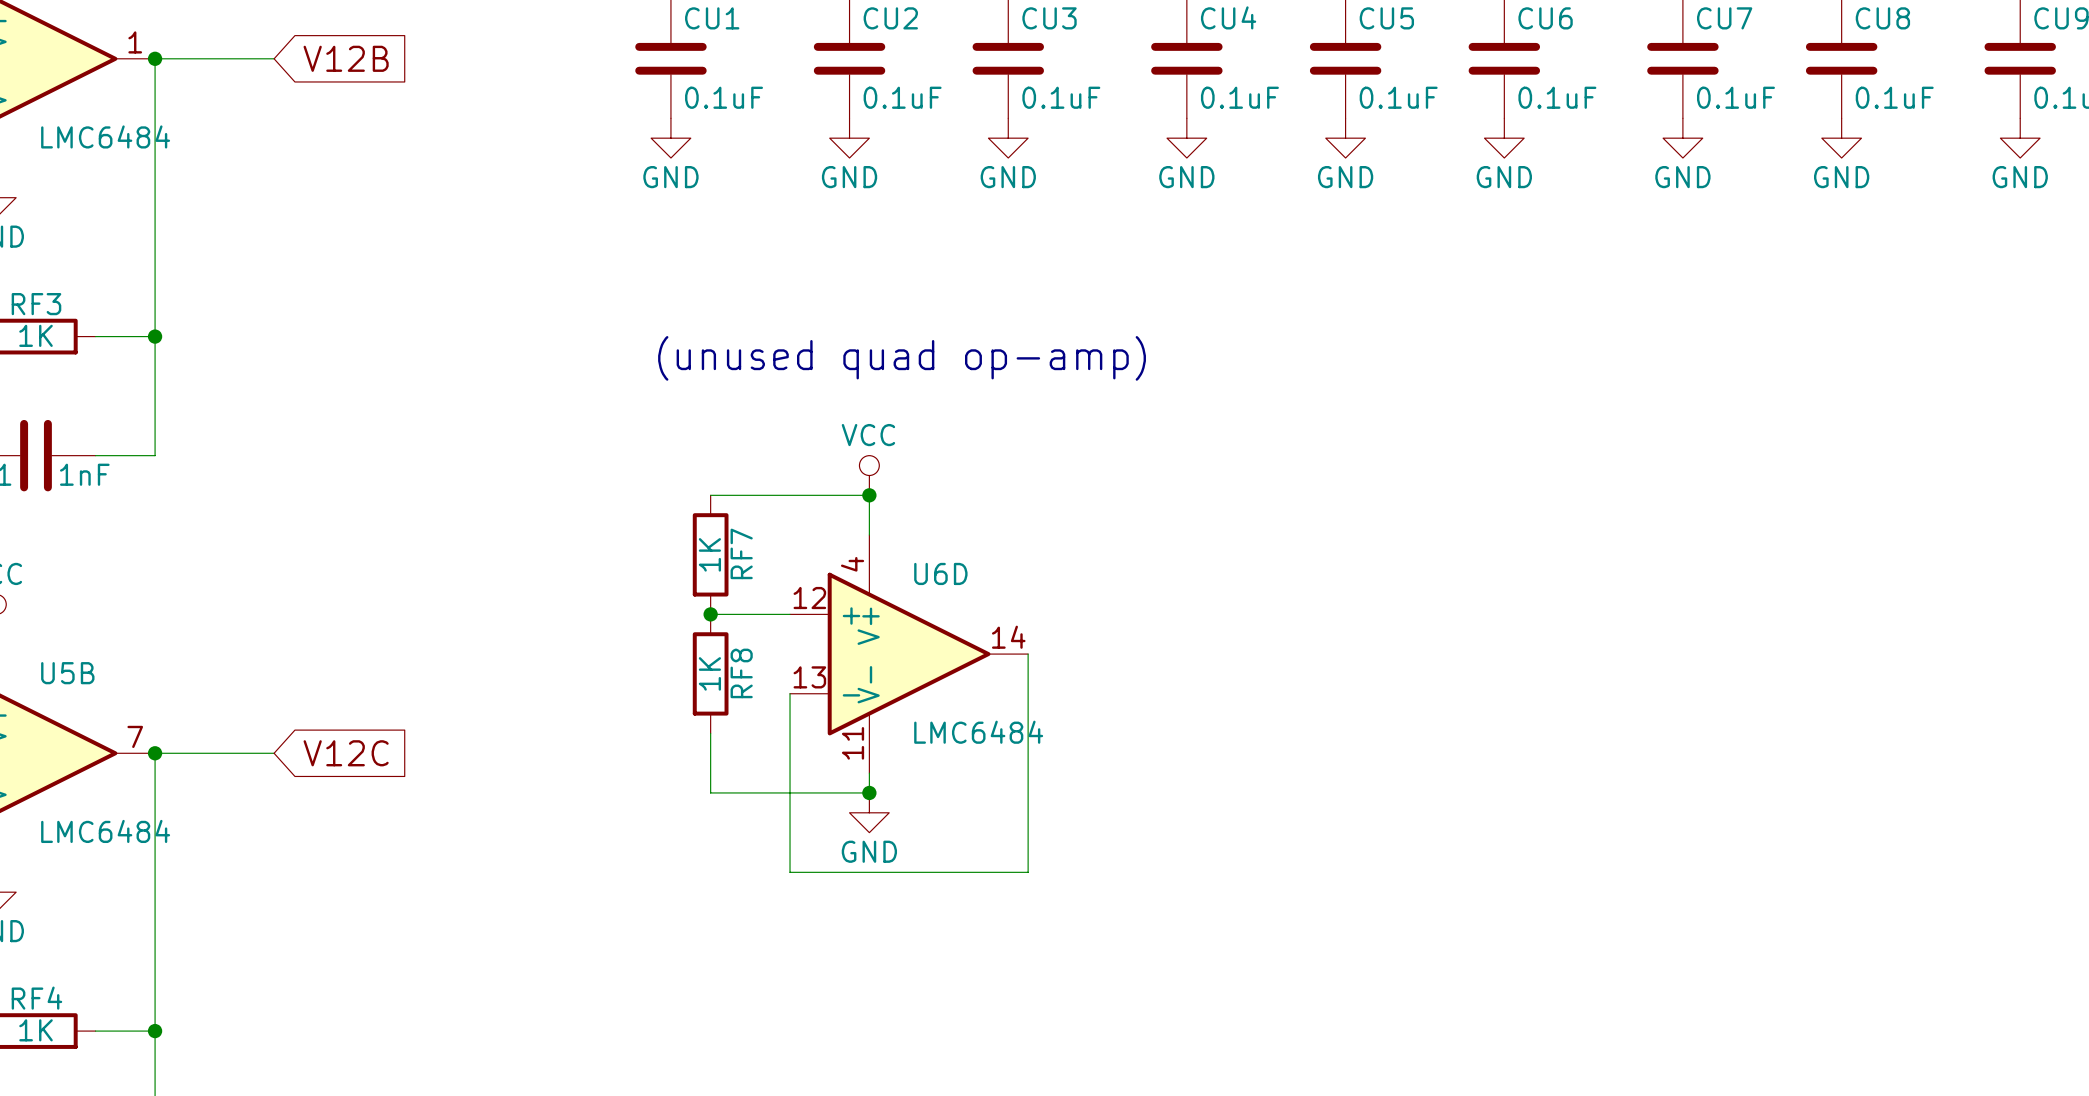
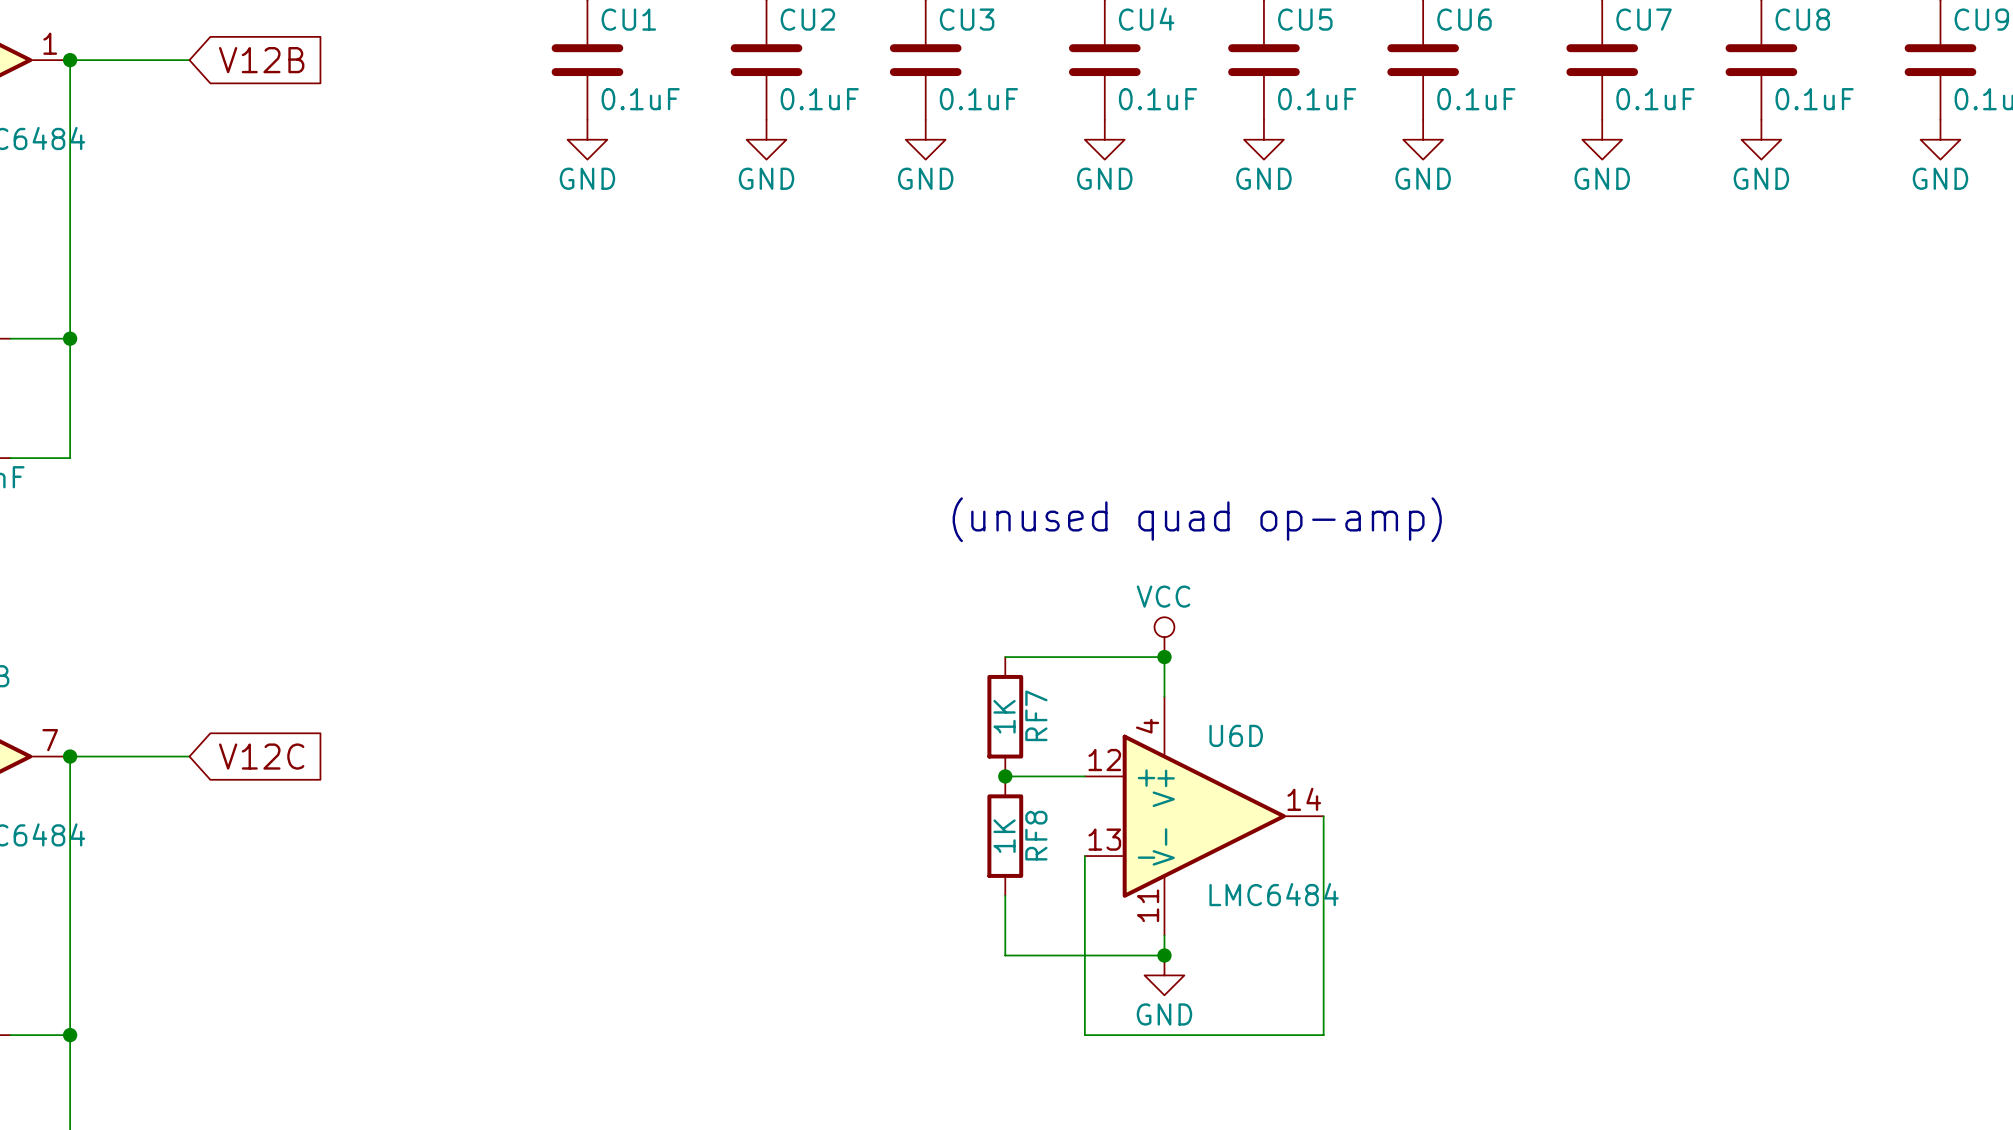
text: (unused quad op-amp) (902, 358) -> none
power symbol: VCC (869, 475) -> none
wire: (710, 495) (869, 495) (869, 535) -> none
junction: (869, 495) -> none
text: none -> (unused quad op-amp) (1197, 519)
RF7 position: (710, 554) -> (1005, 716)
wire: (710, 614) (790, 614) -> none
junction: (710, 614) -> none
power symbol: none -> VCC (1164, 637)
U6D position: (909, 654) -> (1204, 816)
wire: (1028, 654) (1028, 872) (790, 872) (790, 693) -> none
wire: none -> (1005, 657) (1164, 657) (1164, 696)
junction: none -> (1164, 657)
RF8 position: (710, 673) -> (1005, 836)
wire: (710, 733) (710, 792) (869, 792) (869, 773) -> none
wire: none -> (1005, 776) (1084, 776)
junction: none -> (1005, 776)
junction: (869, 792) -> none
power symbol: GND (869, 812) -> none
wire: none -> (1323, 816) (1323, 1035) (1084, 1035) (1084, 856)
wire: none -> (1005, 895) (1005, 955) (1164, 955) (1164, 935)
junction: none -> (1164, 955)
power symbol: none -> GND (1164, 975)

